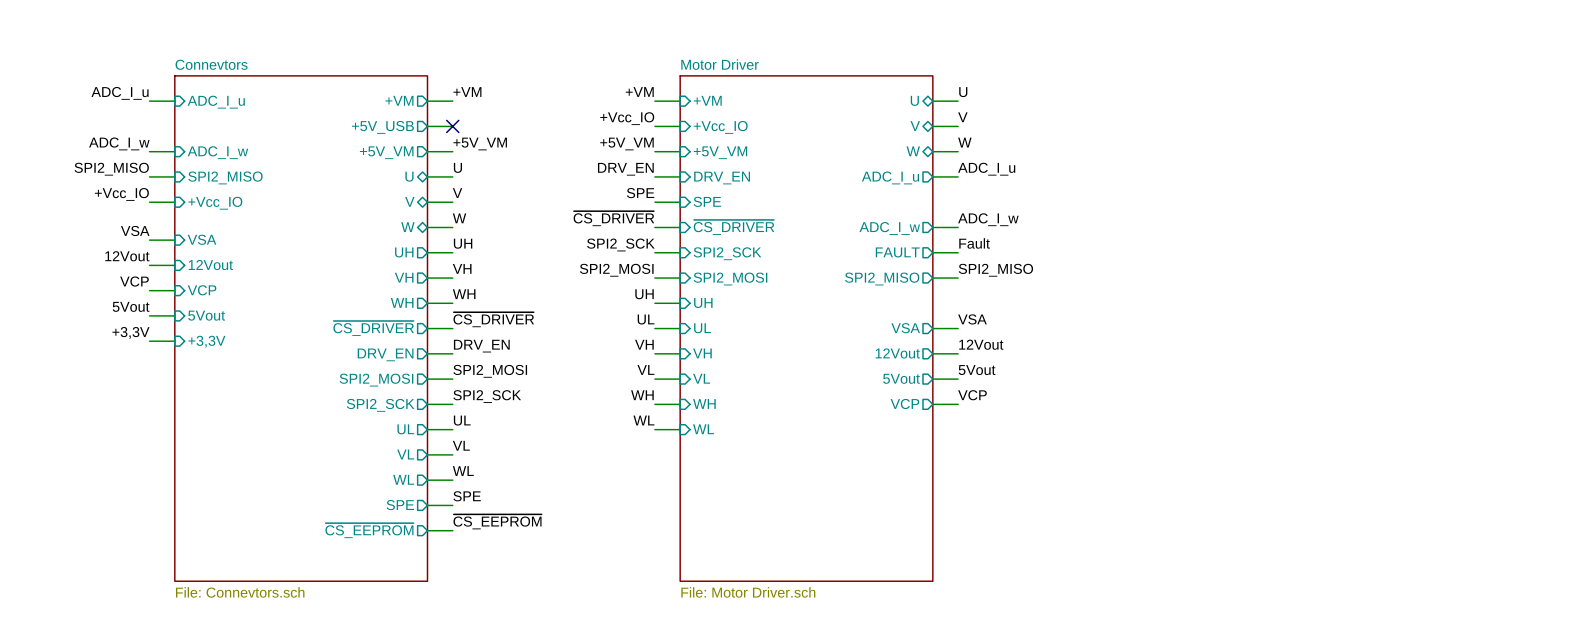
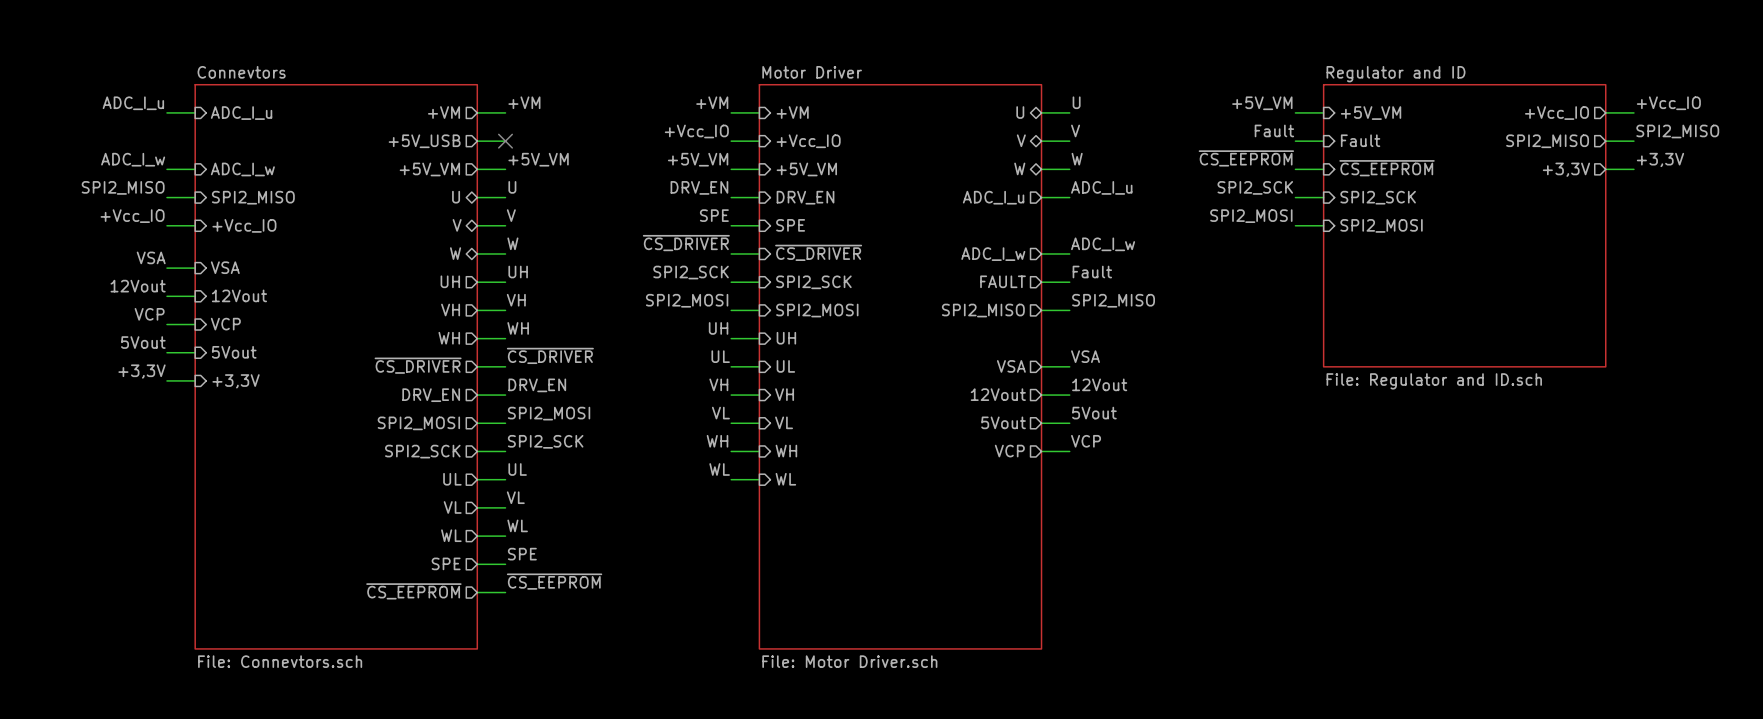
label: none -> +5V_VM (1262, 103)
label: none -> +Vcc_IO (1668, 103)
wire: none -> (1295, 112) (1323, 112)
wire: none -> (1605, 112) (1633, 112)
sheet pin: none -> +5V_VM (1371, 113)
sheet pin: none -> +Vcc_IO (1557, 113)
label: none -> Fault (1274, 130)
label: none -> SPI2_MISO (1677, 131)
sheet pin: none -> Fault (1360, 140)
wire: none -> (1295, 141) (1323, 141)
wire: none -> (1605, 141) (1633, 141)
sheet pin: none -> SPI2_MISO (1547, 141)
label: none -> ~{CS_EEPROM} (1246, 158)
label: none -> +3,3V (1660, 159)
wire: none -> (1295, 169) (1323, 169)
sheet pin: none -> ~{CS_EEPROM} (1387, 168)
wire: none -> (1605, 169) (1633, 169)
sheet pin: none -> +3,3V (1566, 169)
label: none -> SPI2_SCK (1255, 187)
wire: none -> (1295, 197) (1323, 197)
sheet pin: none -> SPI2_SCK (1378, 197)
label: none -> SPI2_MOSI (1251, 216)
wire: none -> (1295, 225) (1323, 225)
sheet Regulator and ID: none -> File: Regulator and ID.sch (1464, 225)
sheet pin: none -> SPI2_MOSI (1381, 225)

